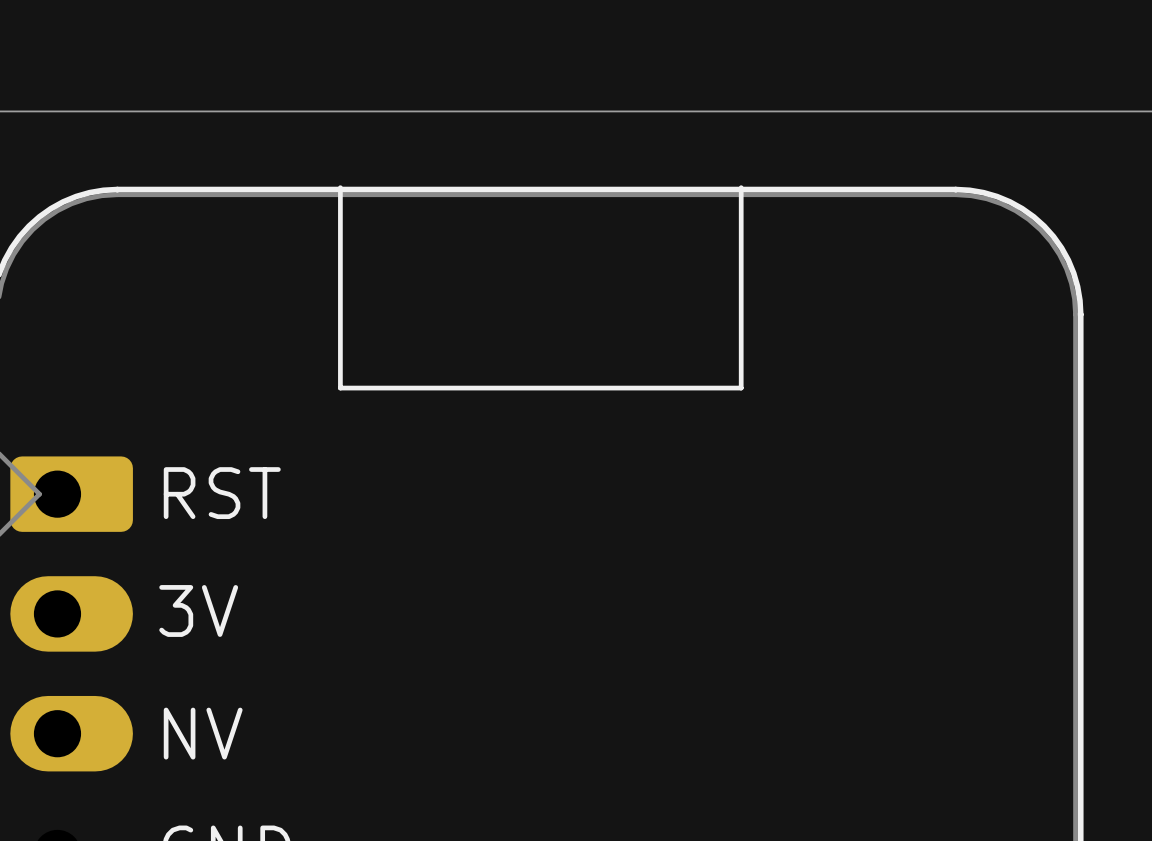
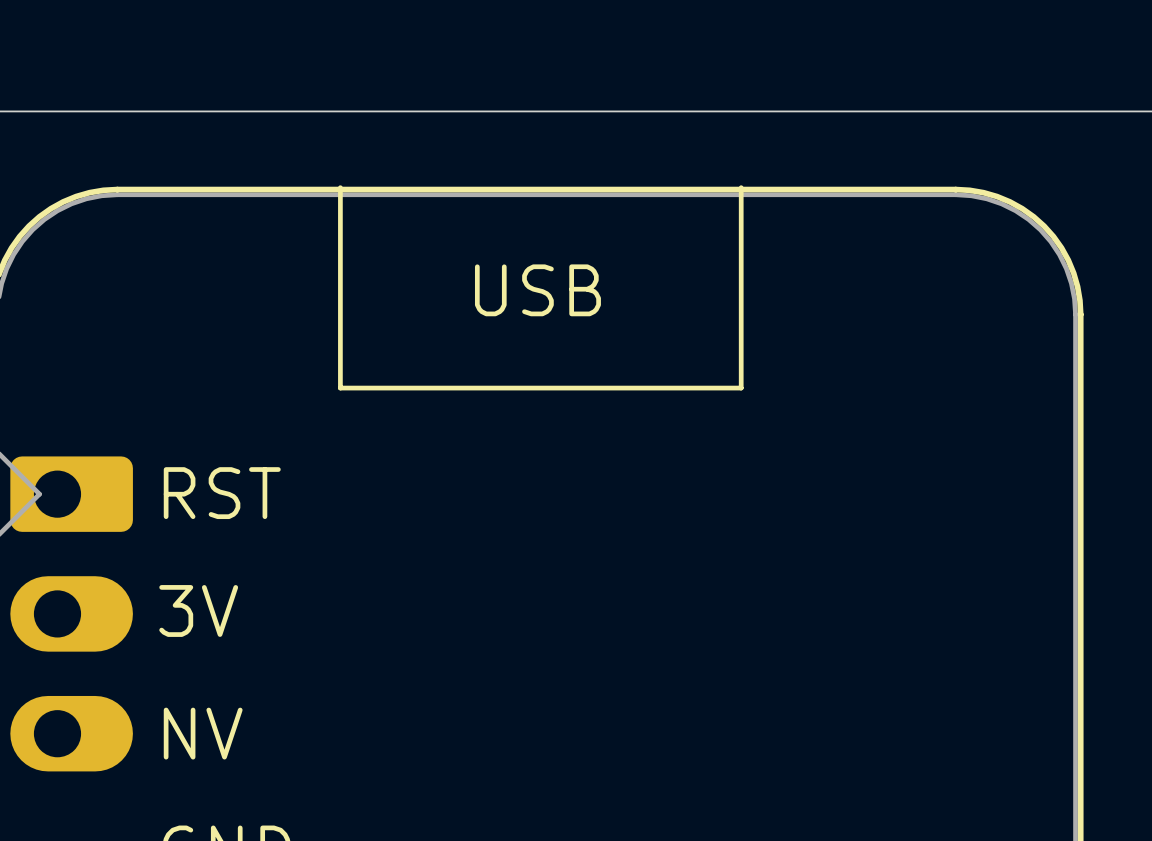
part text: none -> USB (537, 290)

